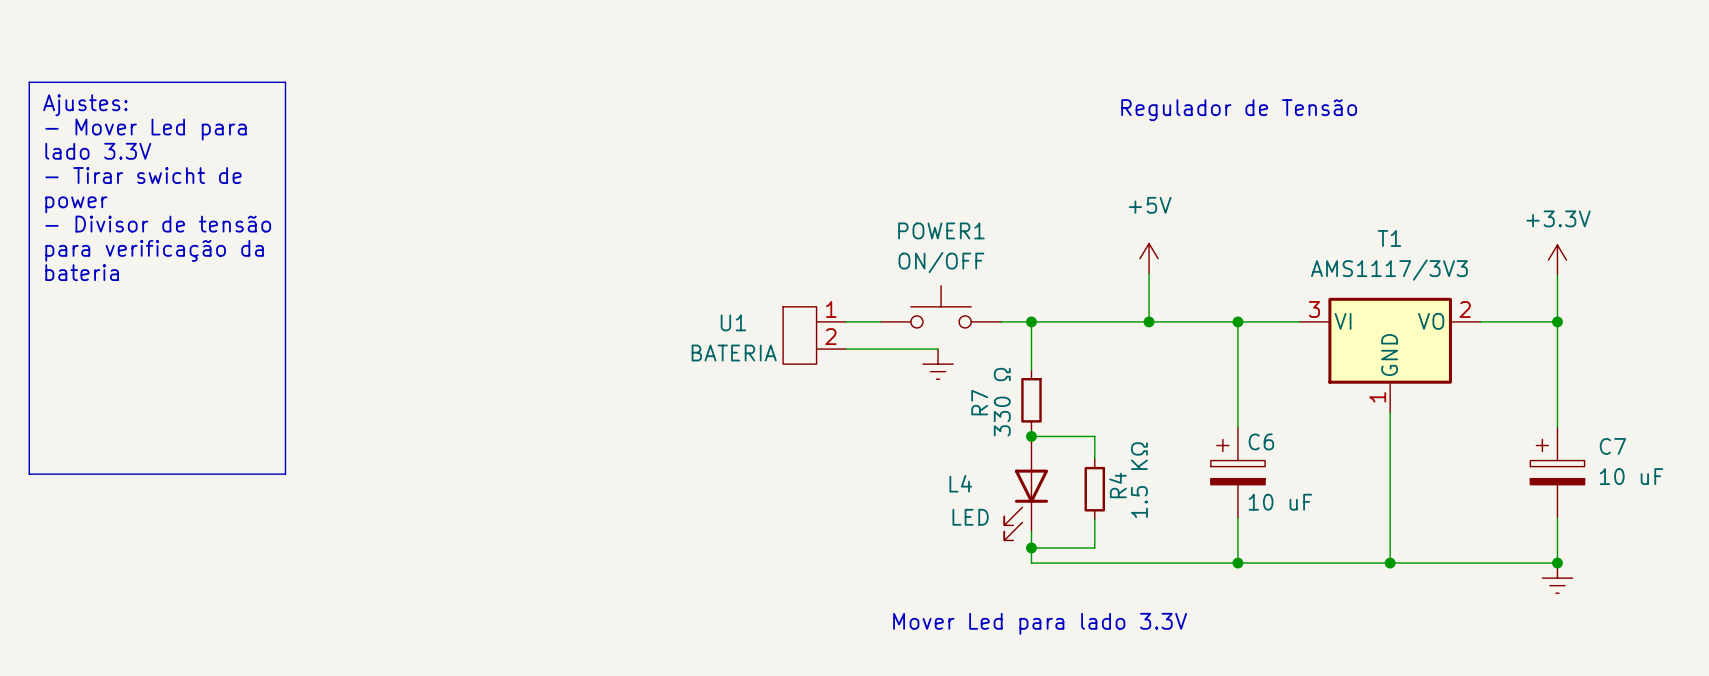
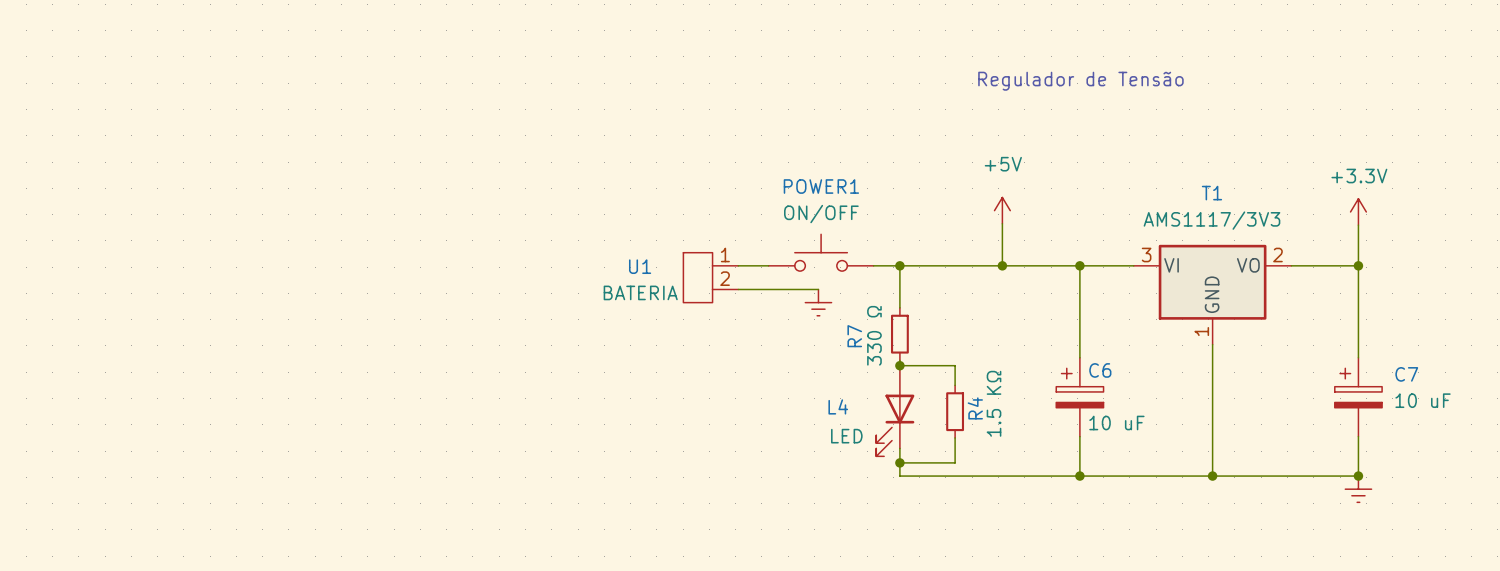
line: (29, 82) (285, 82) (285, 474) (29, 474) (29, 82) -> none
text: Ajustes: (85, 105) -> none
text: - Mover Led para (146, 129) -> none
text: lado 3.3V (98, 151) -> none
text: - Tirar swicht de (143, 175) -> none
text: power (76, 204) -> none
text: - Divisor de tensão (158, 224) -> none
text: para verificação da (154, 250) -> none
text: bateria (82, 272) -> none
text: Mover Led para lado 3.3V (1040, 623) -> none

